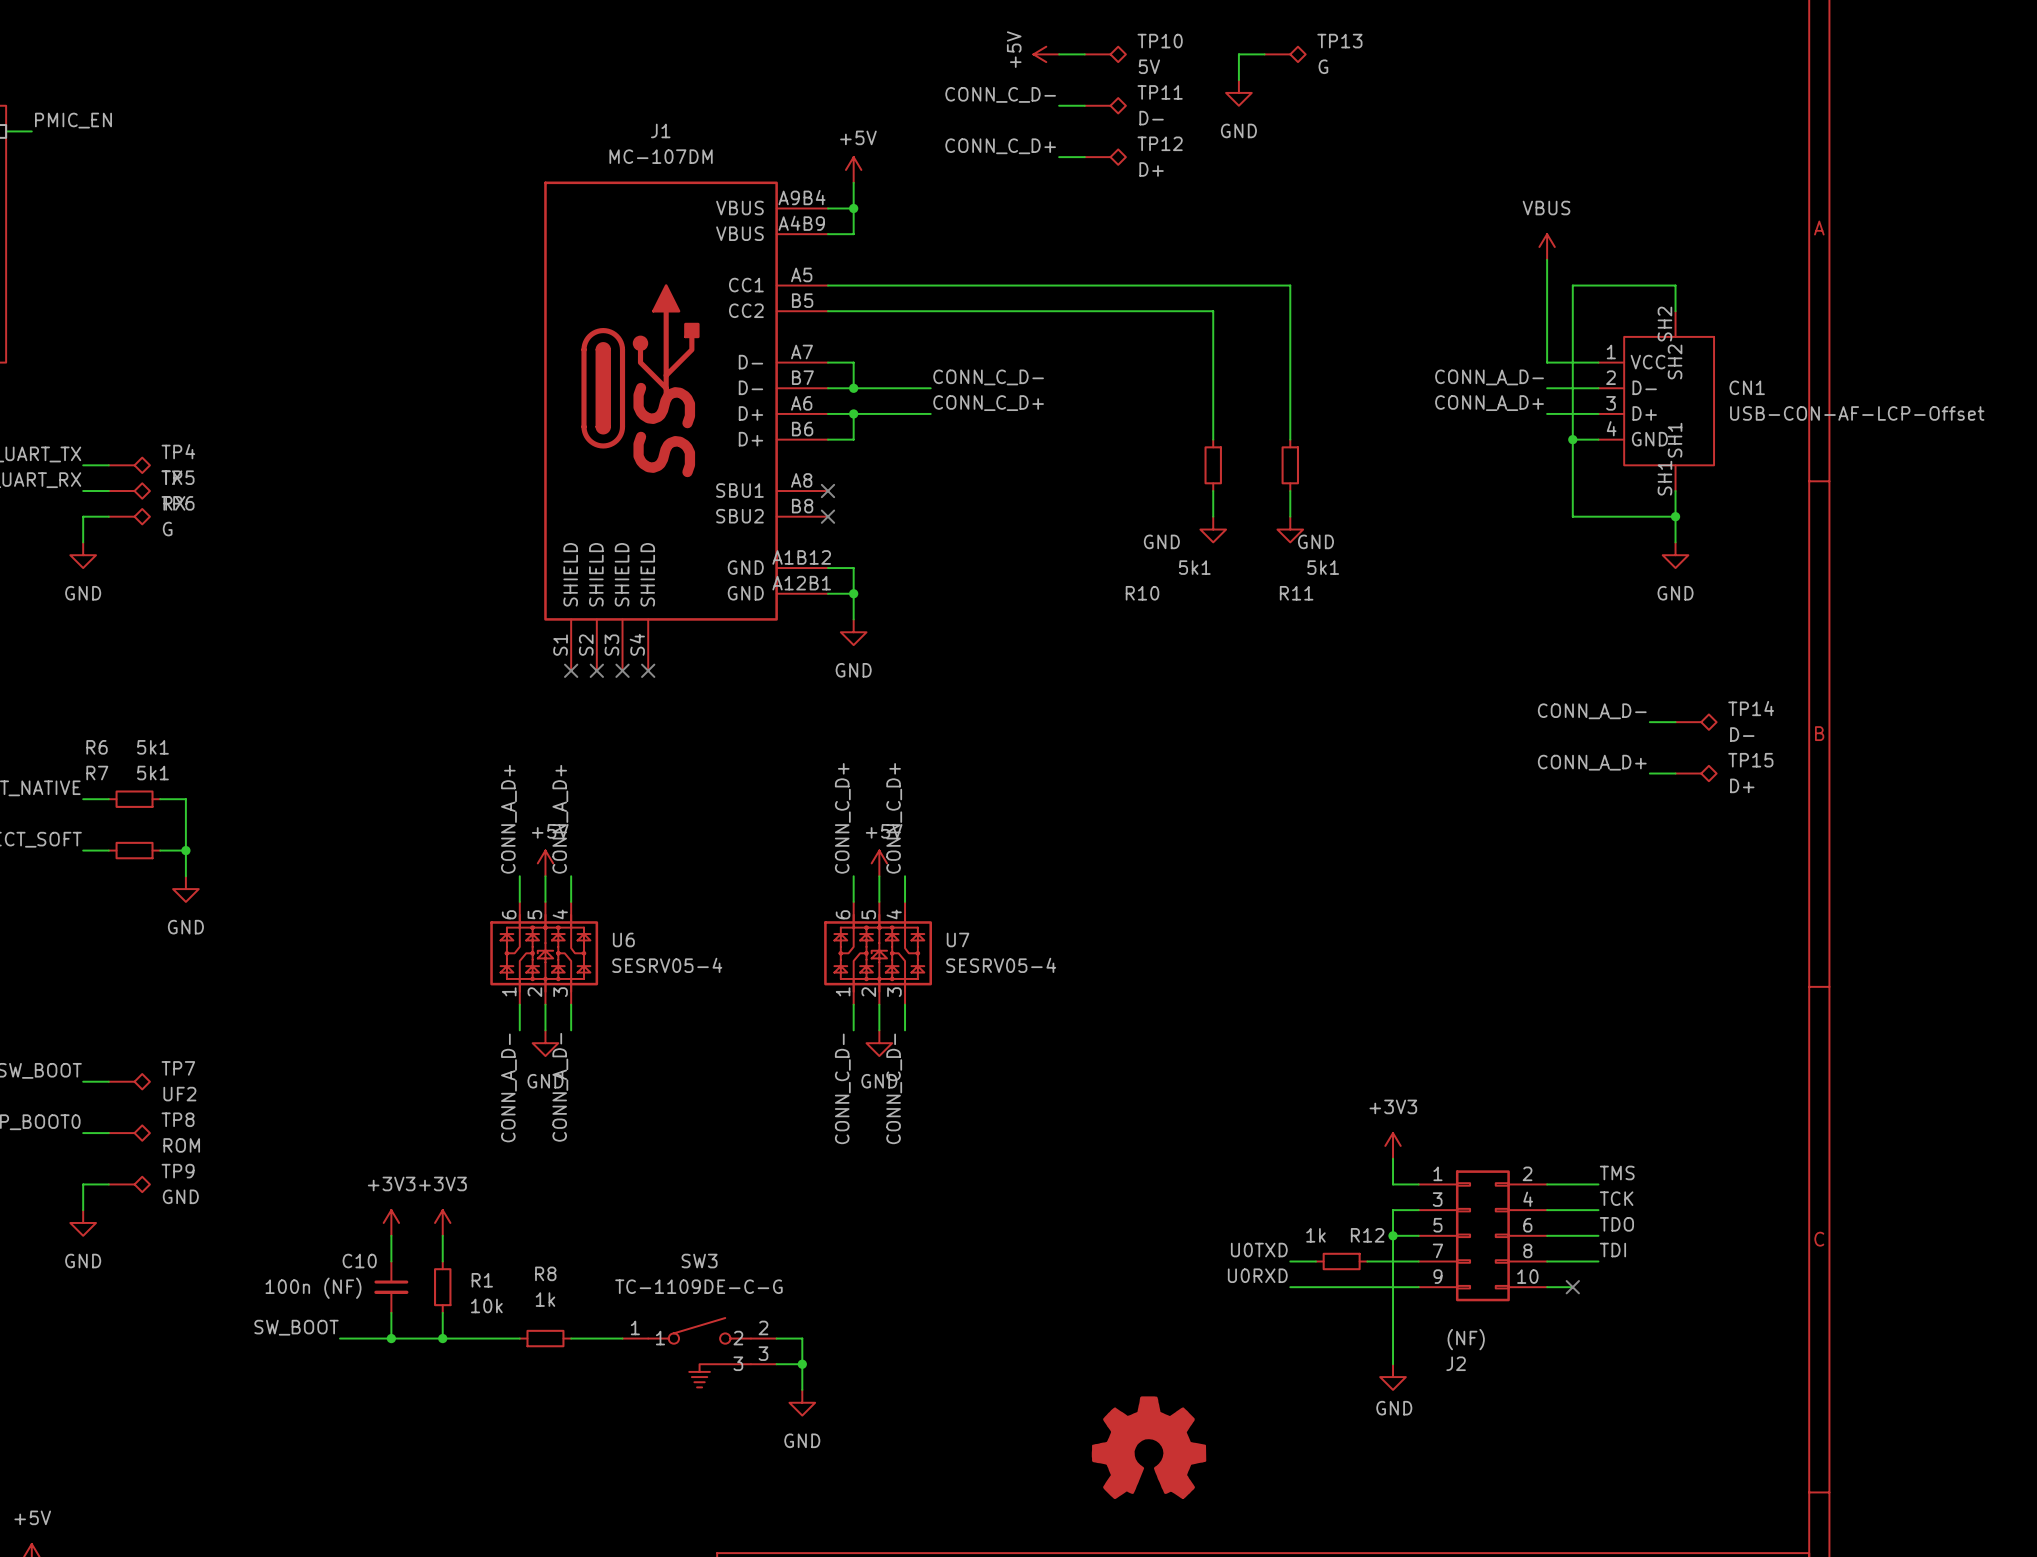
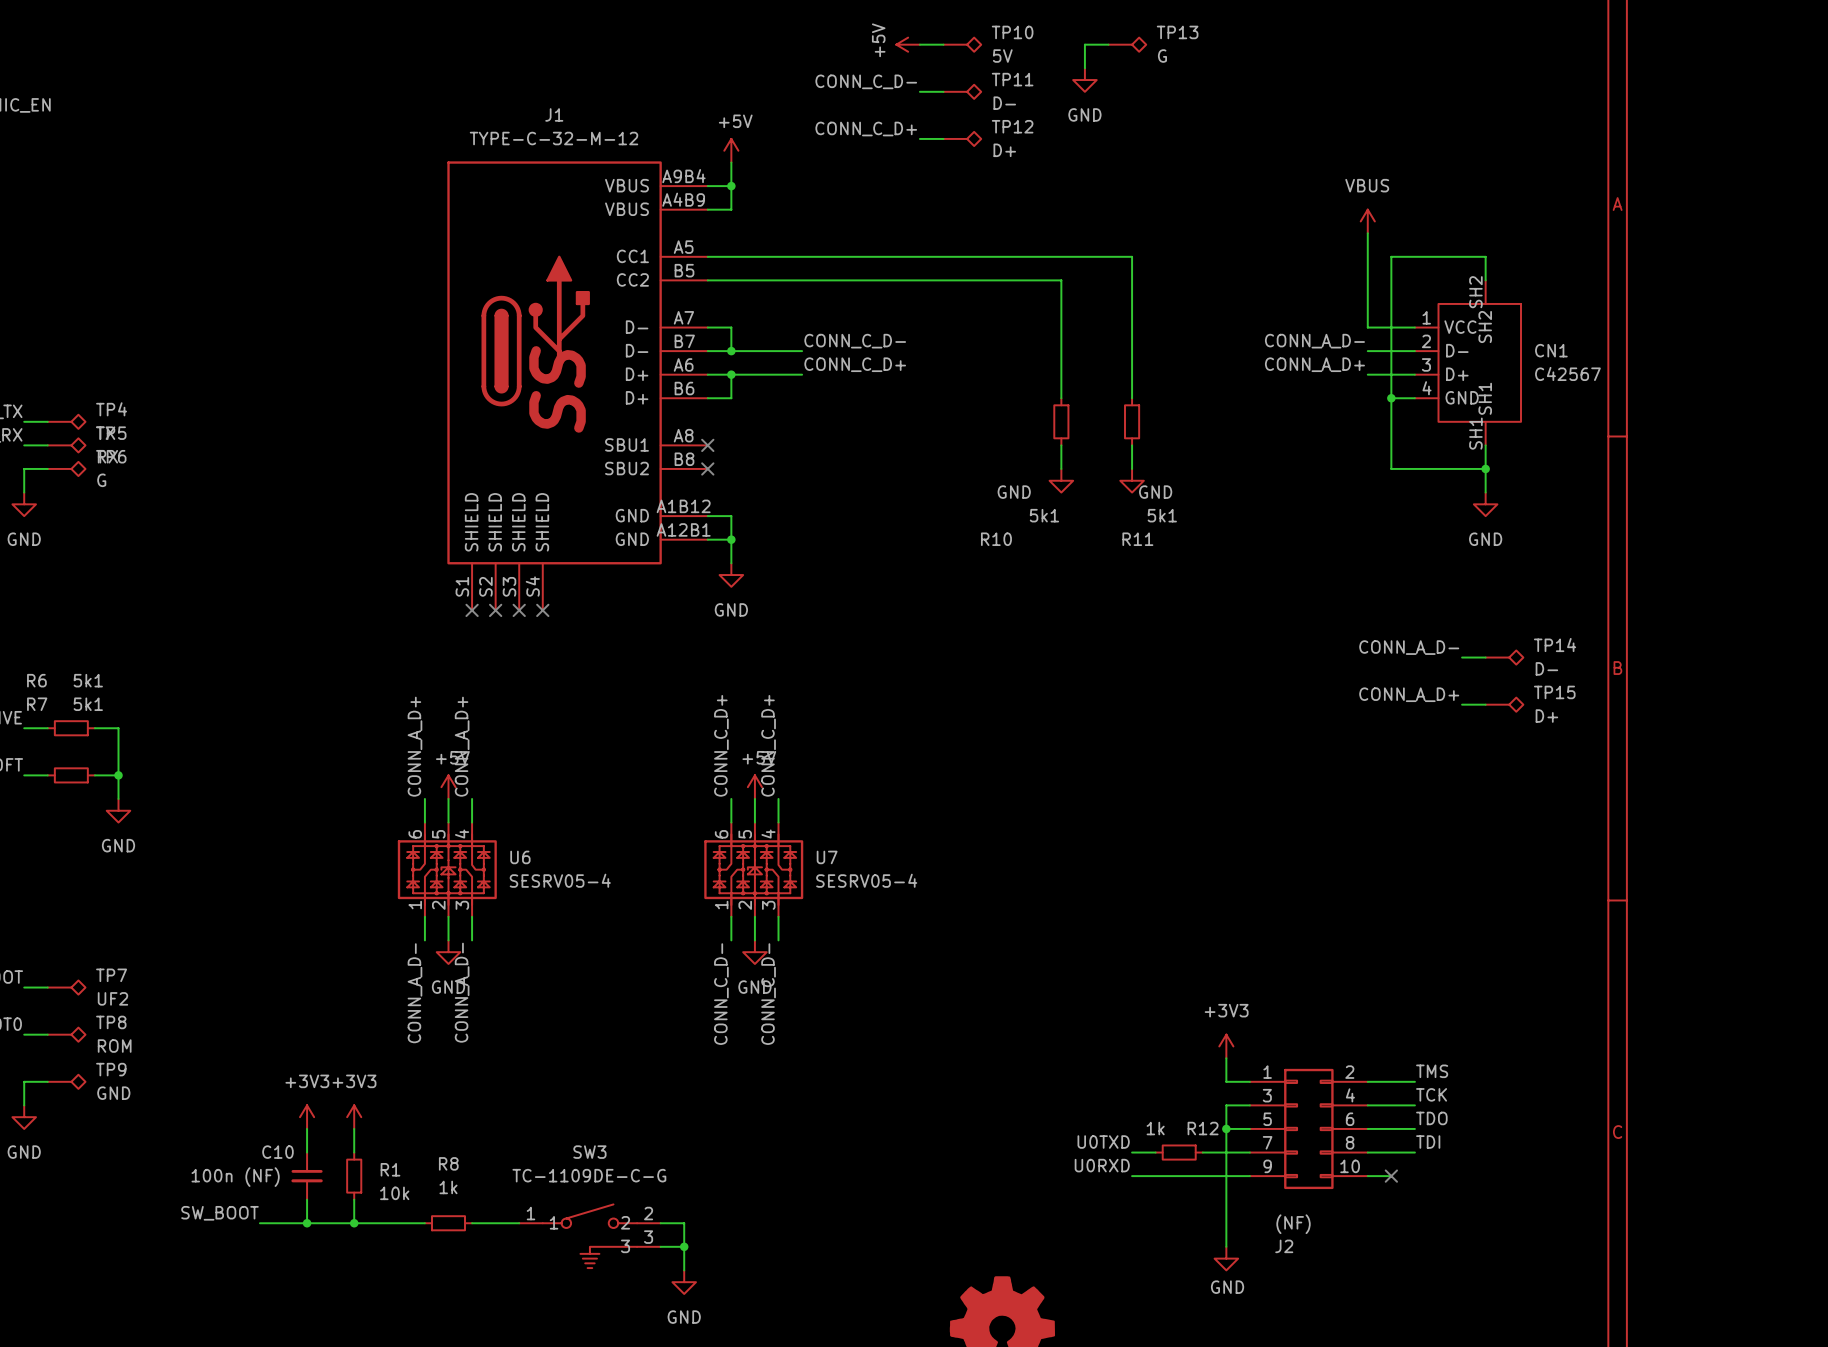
J1 value: MC-107DM (661, 156) -> TYPE-C-32-M-12 (554, 138)
CN1 value: USB-CON-AF-LCP-Offset (1857, 413) -> C42567 (1567, 373)

